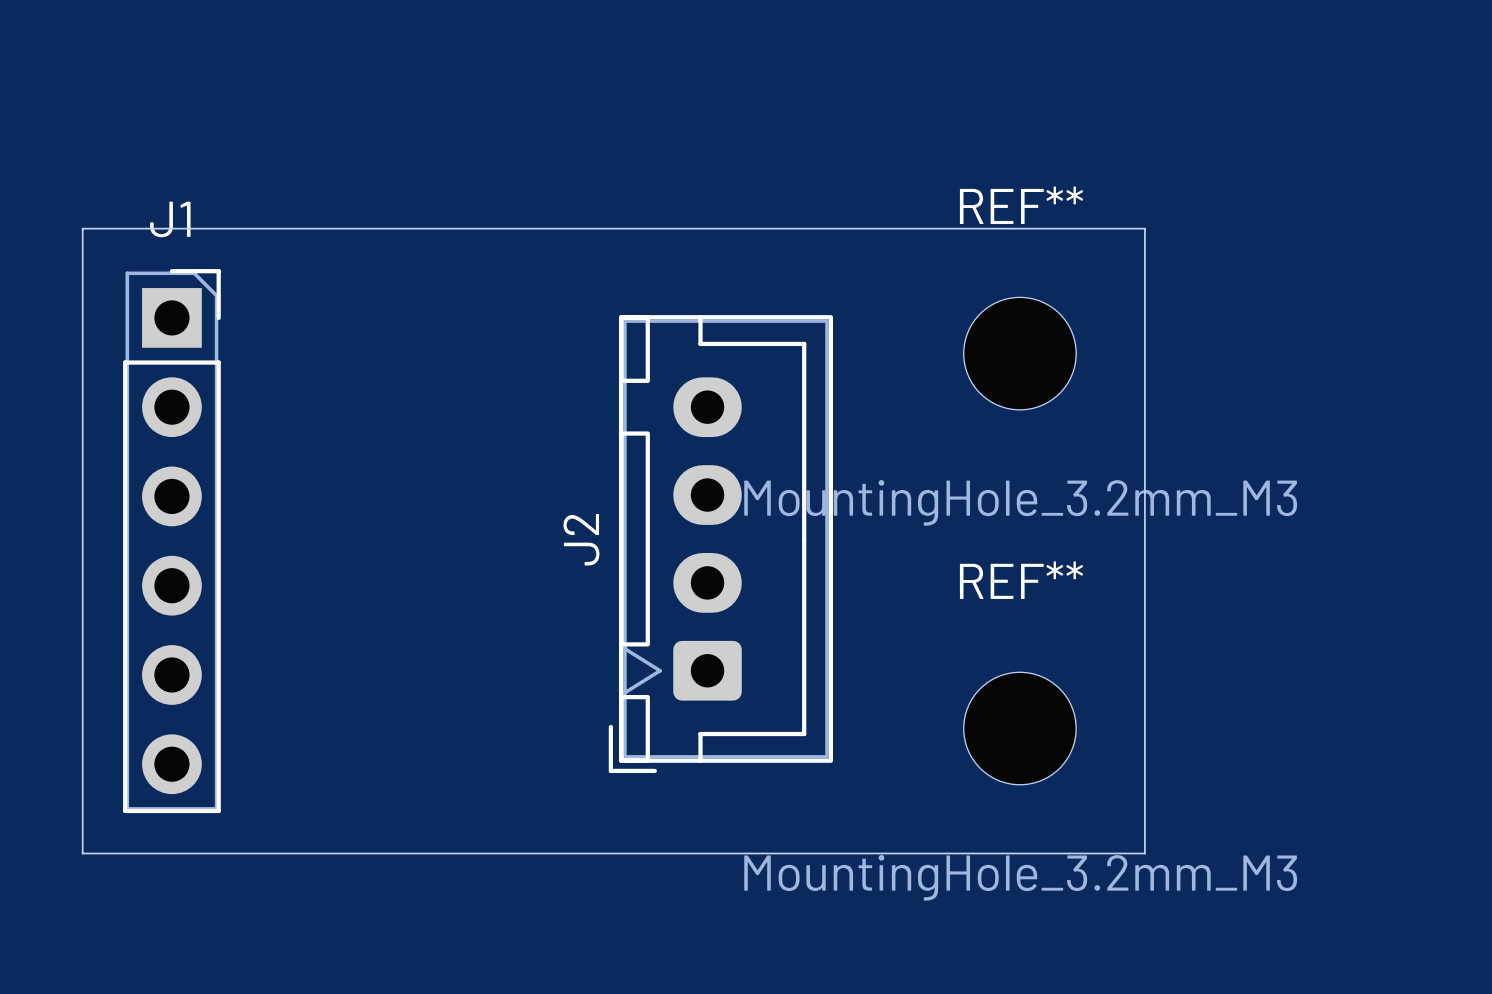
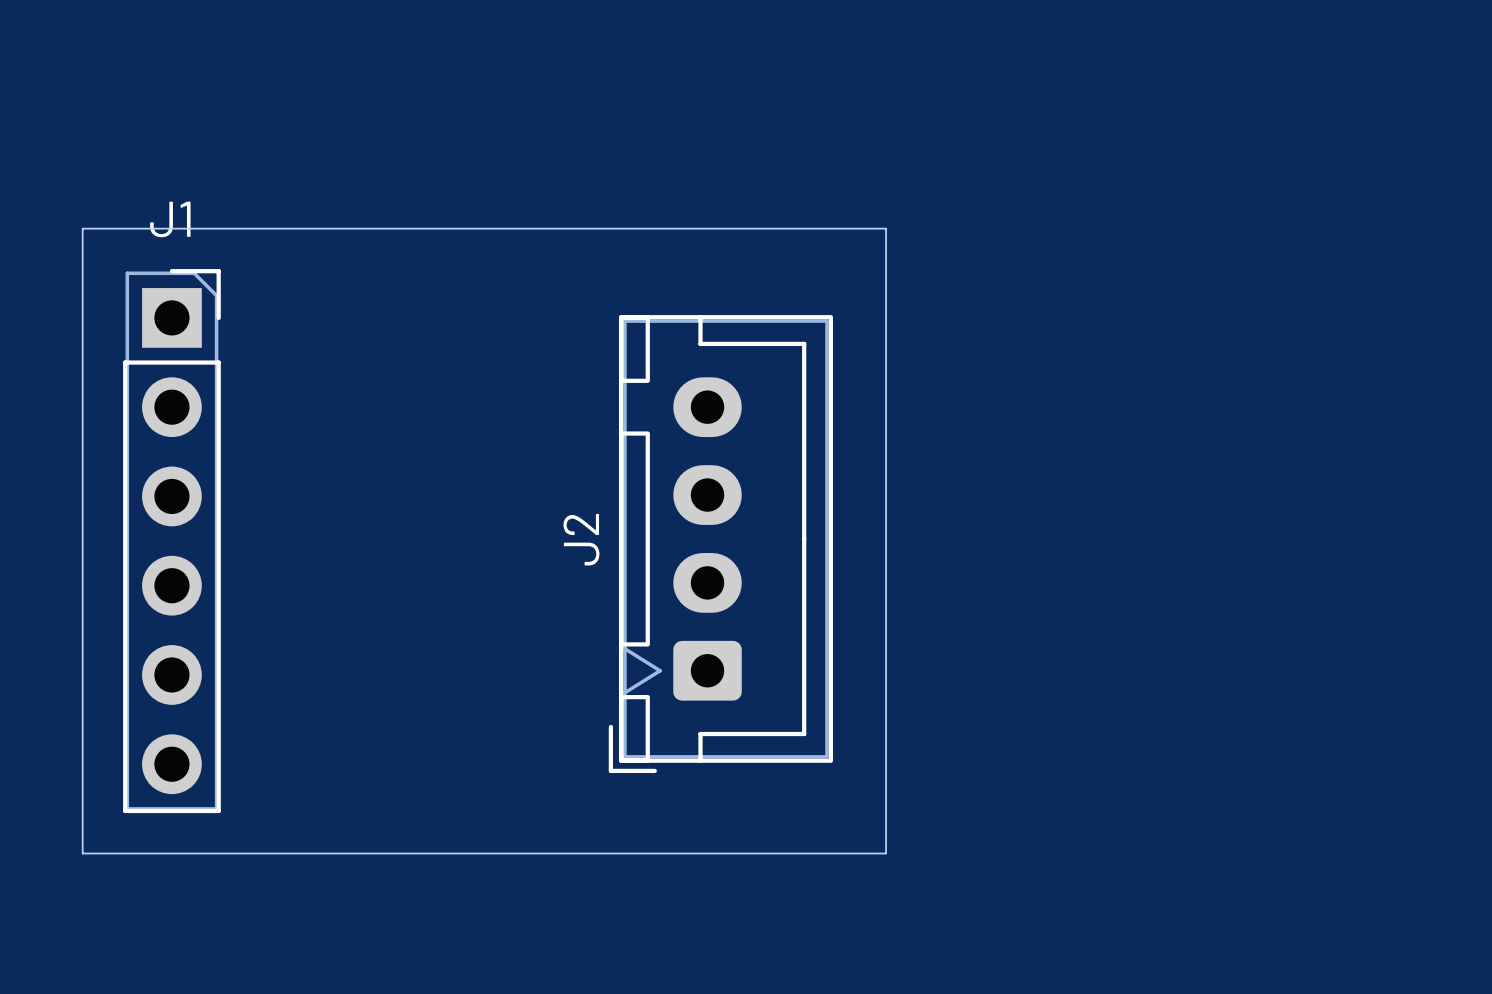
board edge: (886, 228) (1144, 228) (1144, 853) (886, 853) -> (886, 228) (886, 853)
REF**: MountingHole_3.2mm_M3 (1019, 353) -> none
REF**: MountingHole_3.2mm_M3 (1019, 728) -> none

